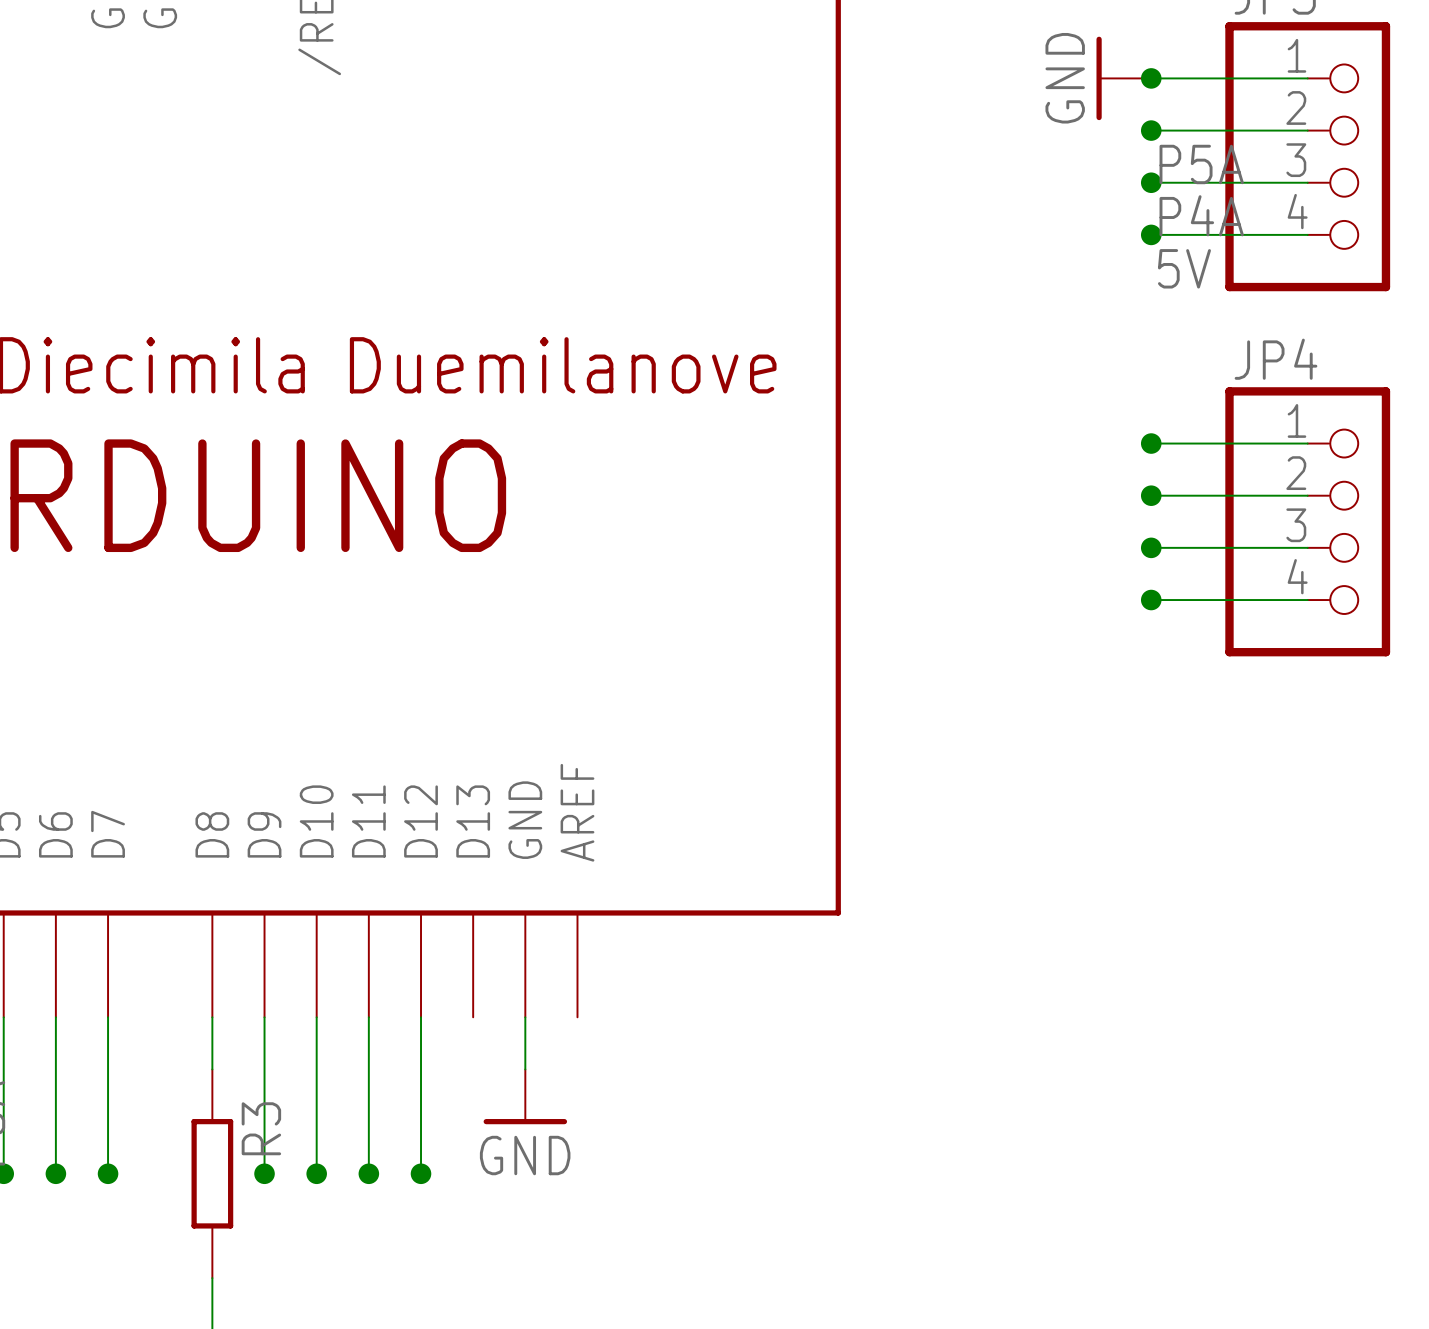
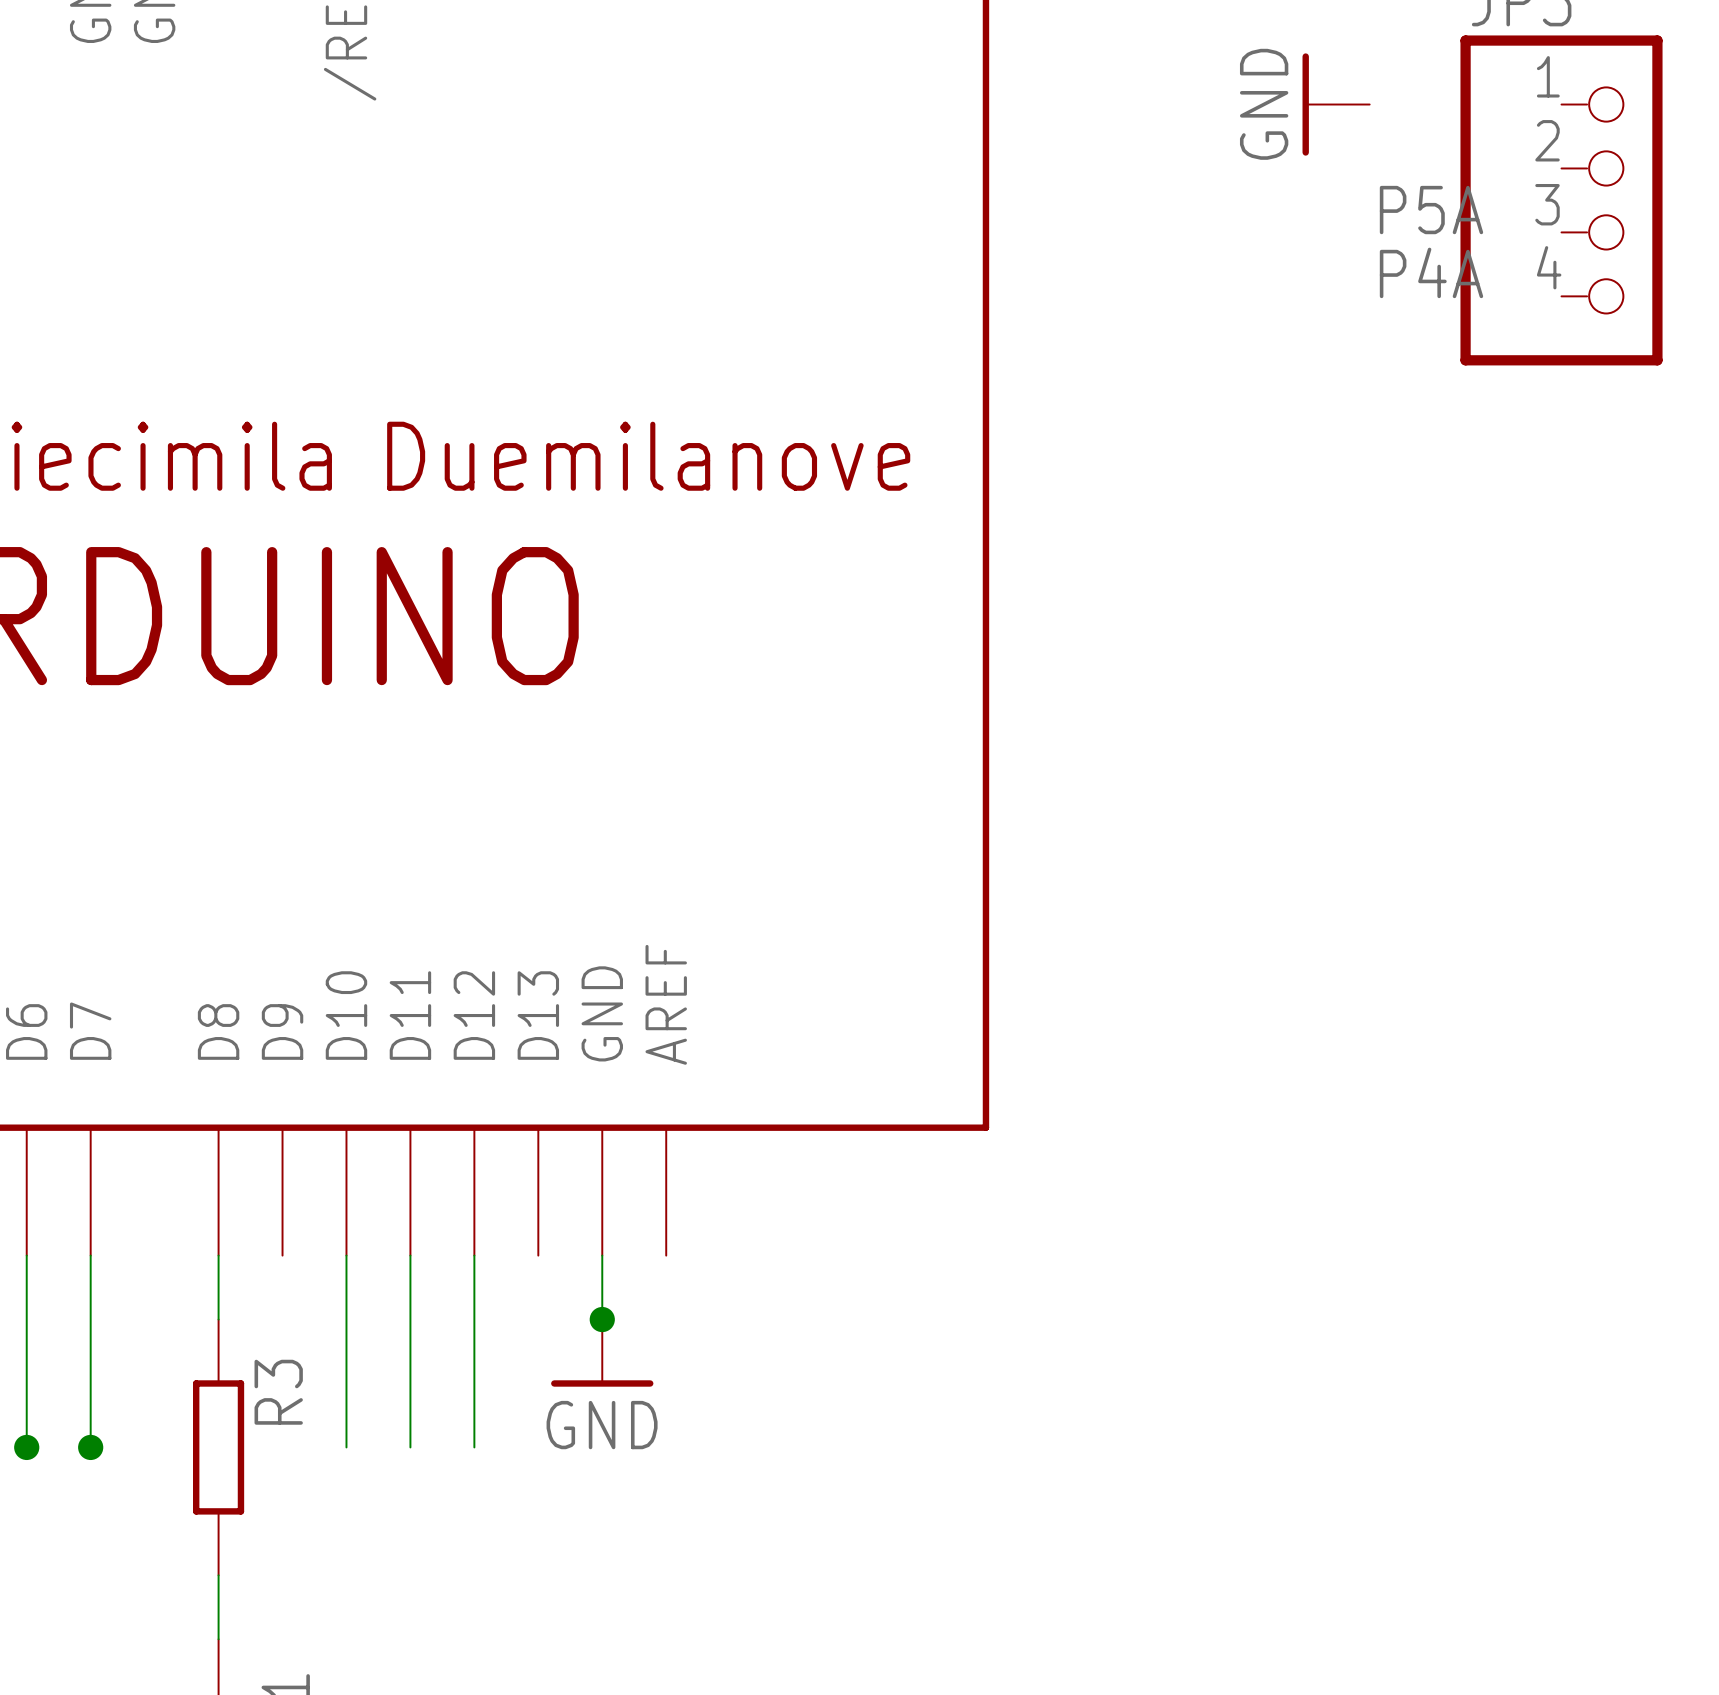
wire: (1151, 78) (1307, 78) -> none
junction: (1151, 78) -> none
wire: (1151, 130) (1307, 130) -> none
junction: (1151, 130) -> none
wire: (1151, 182) (1307, 182) -> none
junction: (1151, 182) -> none
wire: (1151, 234) (1307, 234) -> none
junction: (1151, 234) -> none
label: 5V (1184, 268) -> none
wire: (1151, 443) (1307, 443) -> none
junction: (1151, 443) -> none
wire: (1151, 495) (1307, 495) -> none
junction: (1151, 495) -> none
JP4: (1307, 521) -> none
wire: (1151, 547) (1307, 547) -> none
junction: (1151, 547) -> none
wire: (1151, 600) (1307, 600) -> none
junction: (1151, 600) -> none
wire: (264, 1017) (264, 1173) -> none
junction: none -> (602, 1319)
junction: (264, 1173) -> none
junction: (316, 1173) -> none
junction: (368, 1173) -> none
junction: (421, 1173) -> none

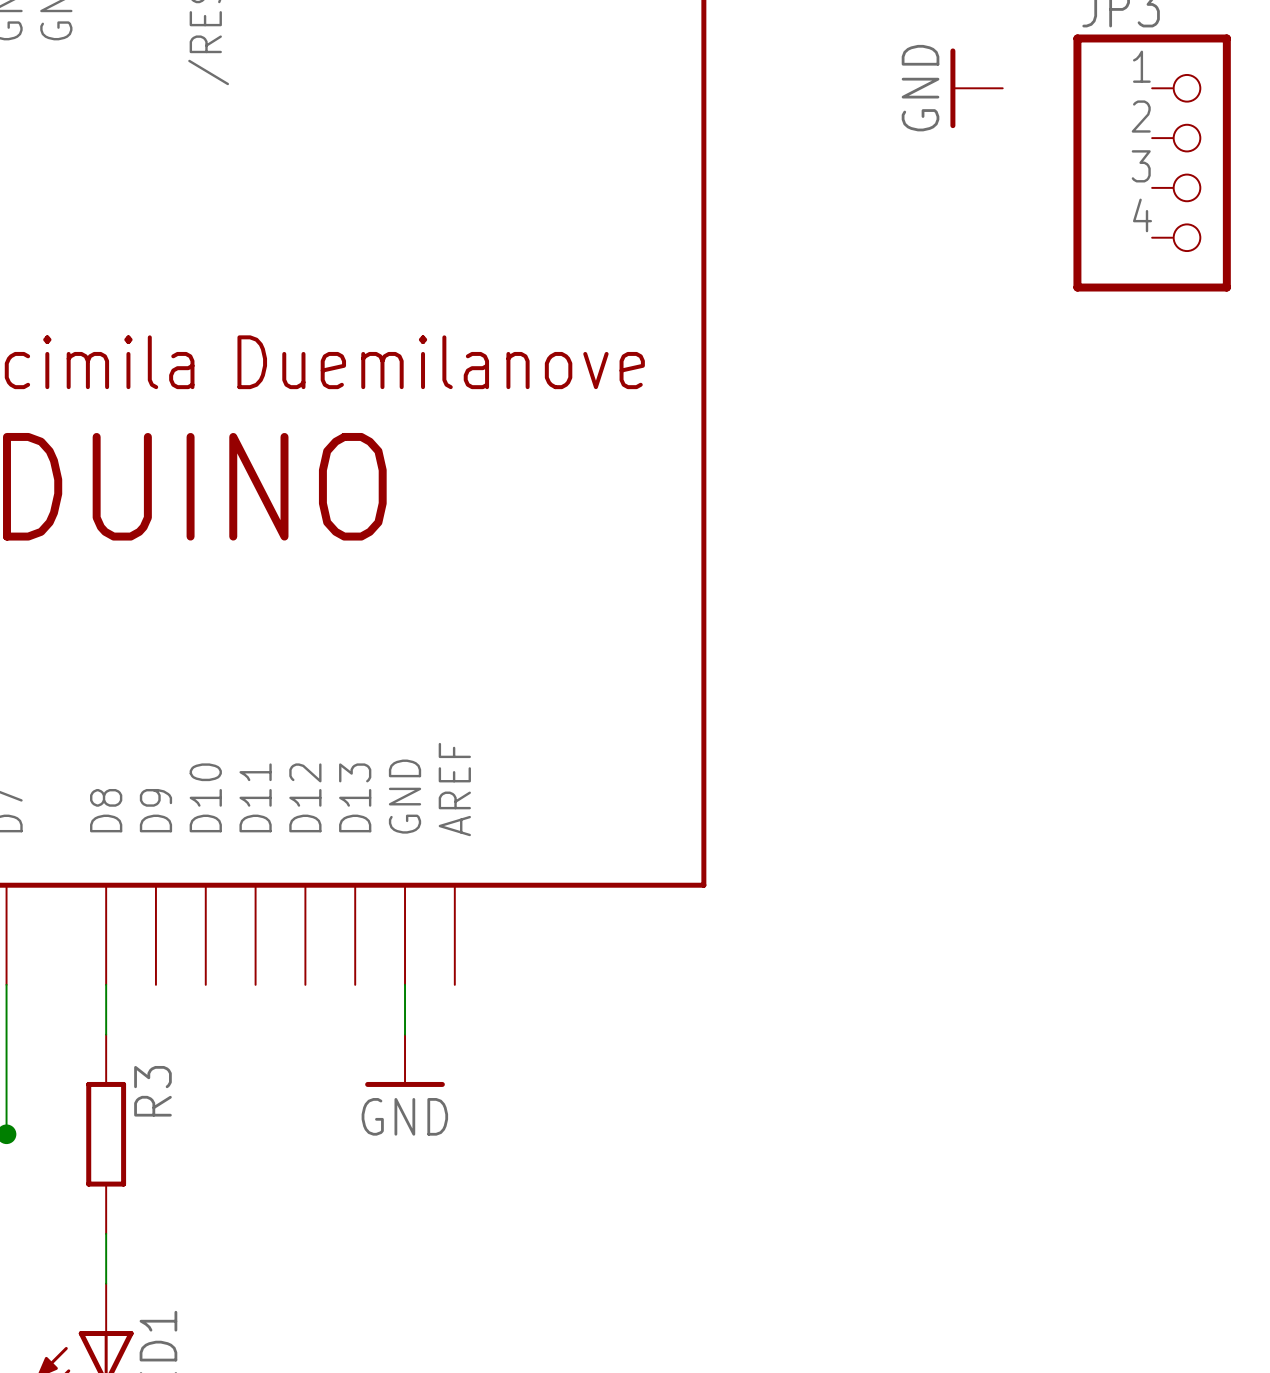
label: P5A (1431, 210) -> none
label: P4A (1431, 272) -> none
wire: (346, 1255) (346, 1447) -> none
wire: (410, 1255) (410, 1447) -> none
wire: (474, 1255) (474, 1447) -> none
junction: (602, 1319) -> none

